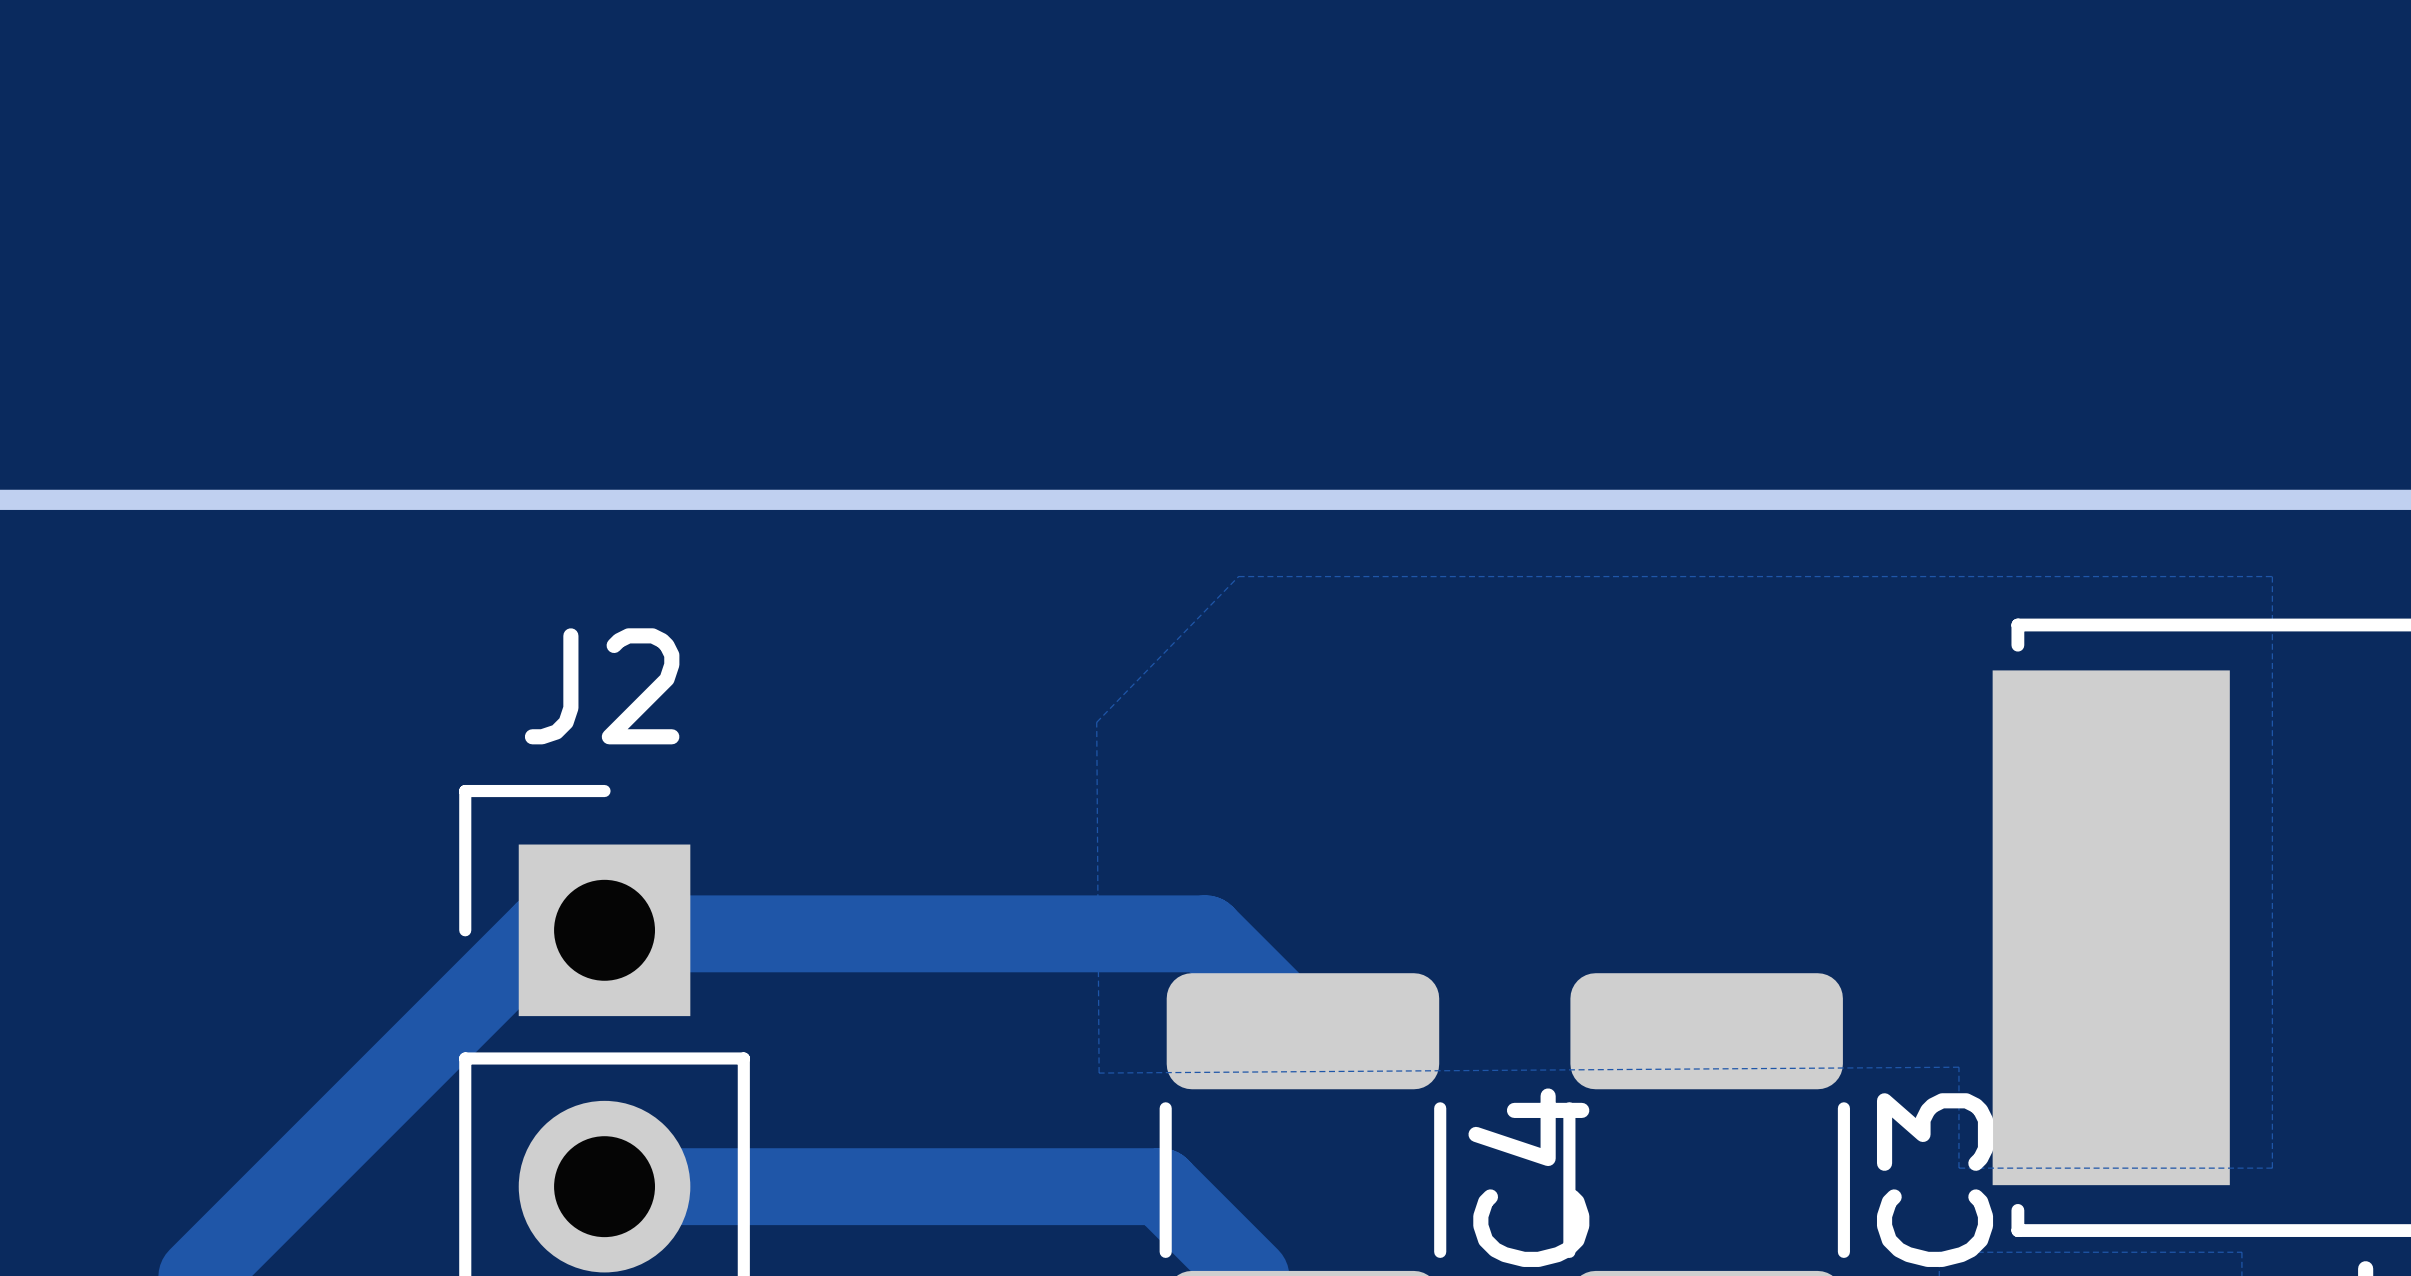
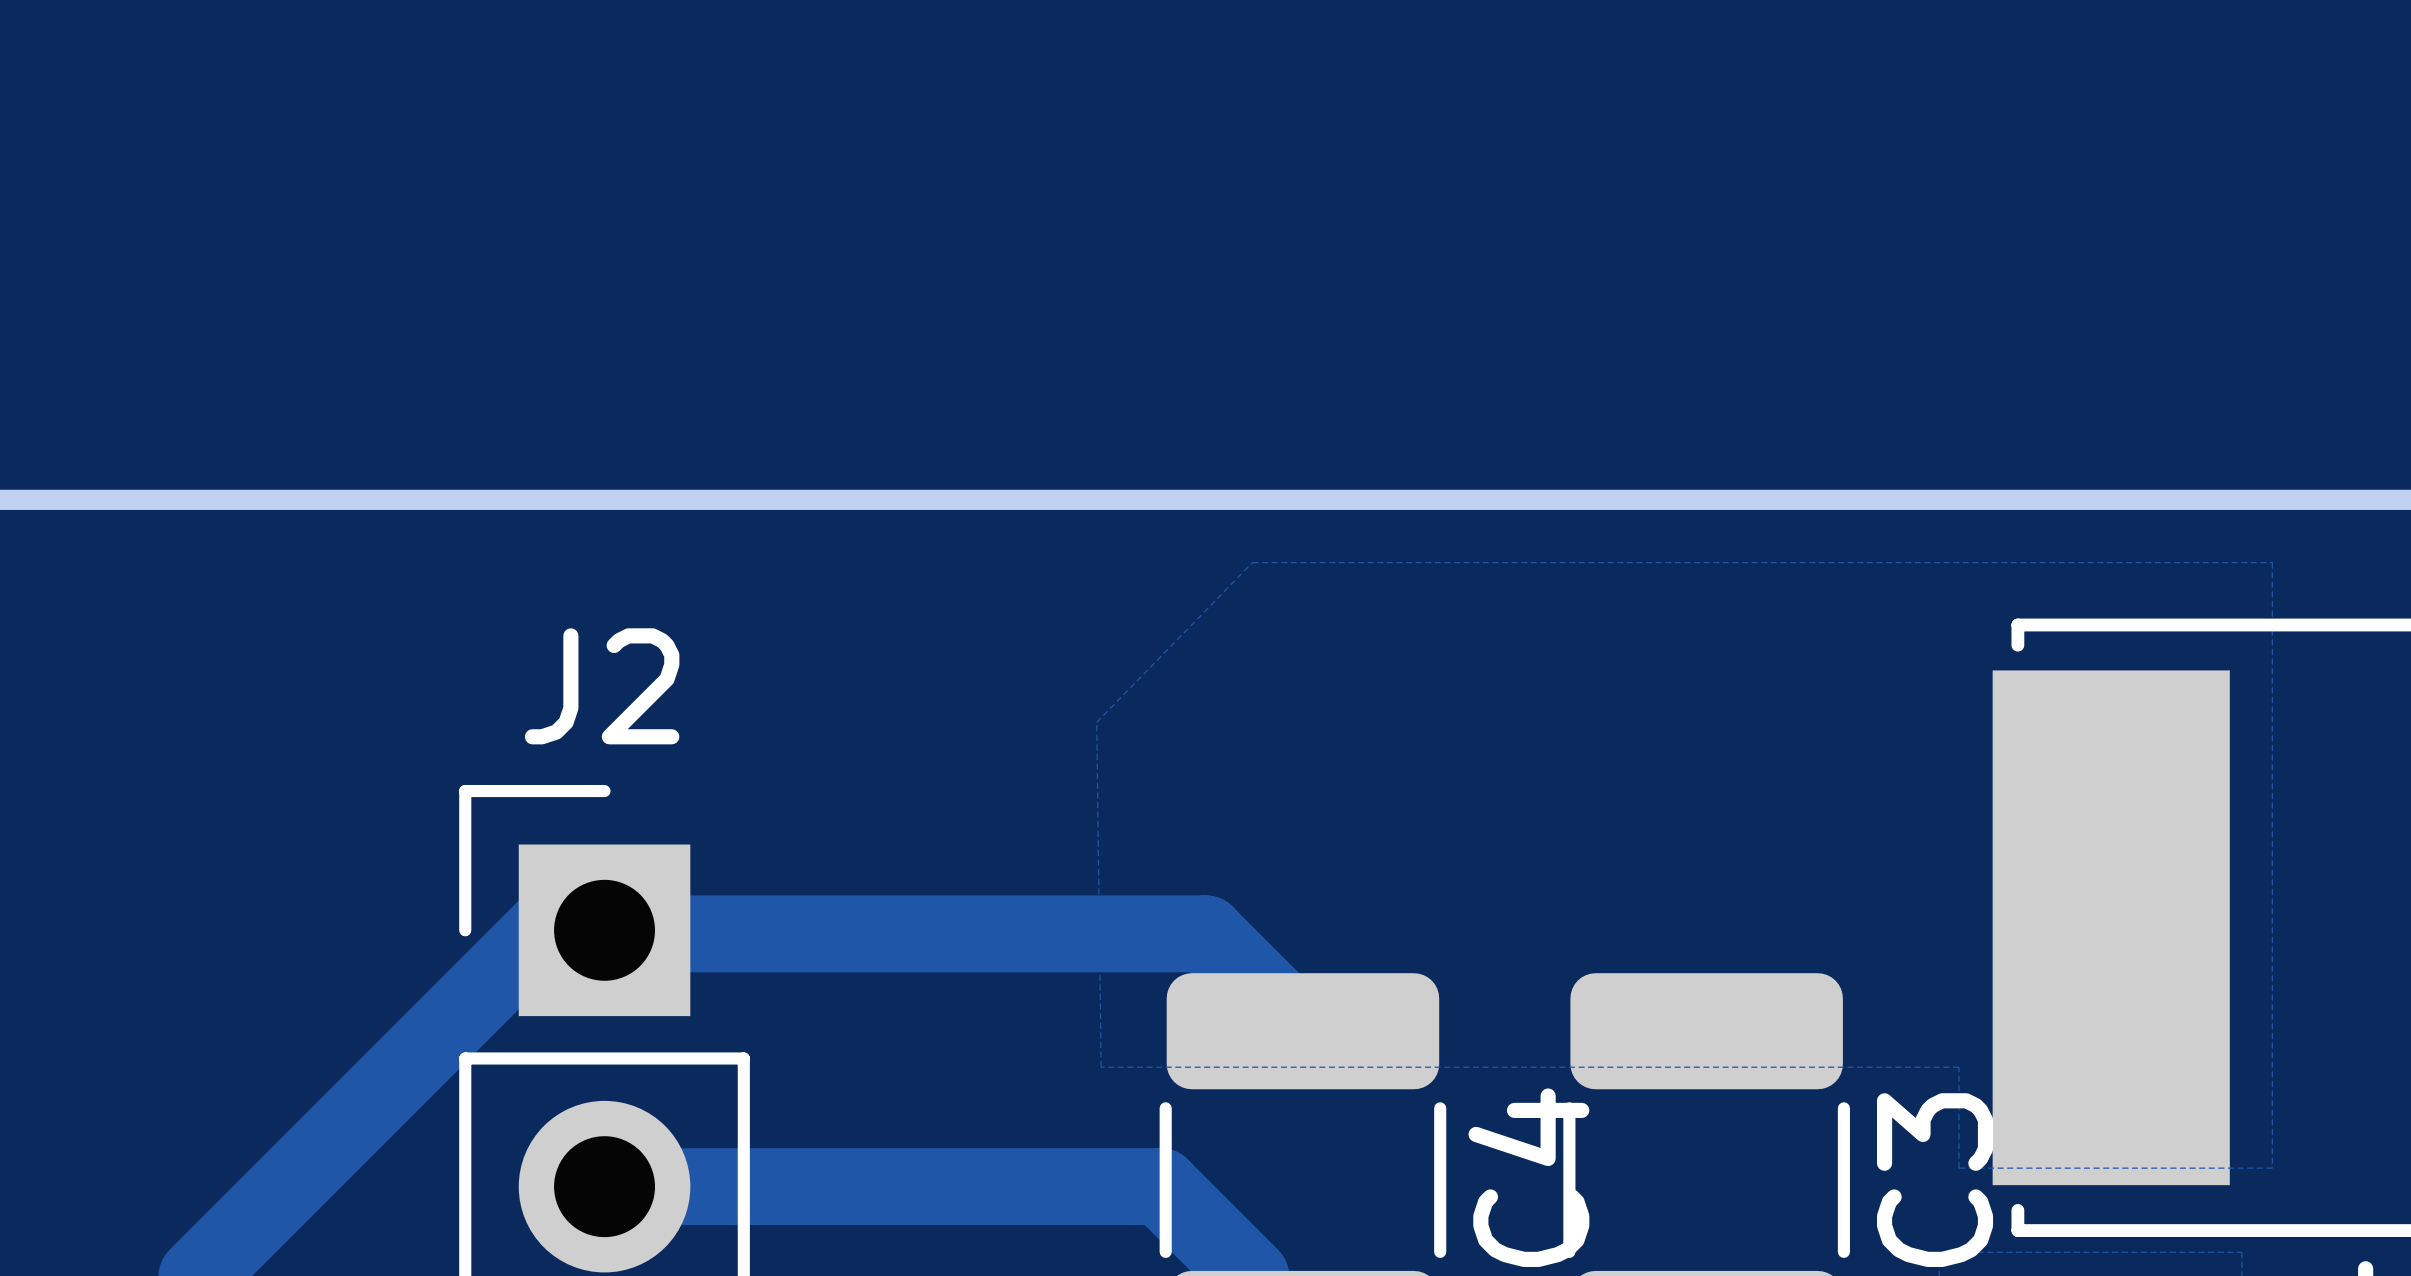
zone outline: (1958, 1067) (1099, 1073) (1096, 722) (1238, 576) (2272, 576) (2272, 1168) -> (1958, 1067) (1101, 1067) (1096, 722) (1252, 562) (2272, 562) (2272, 1168)

